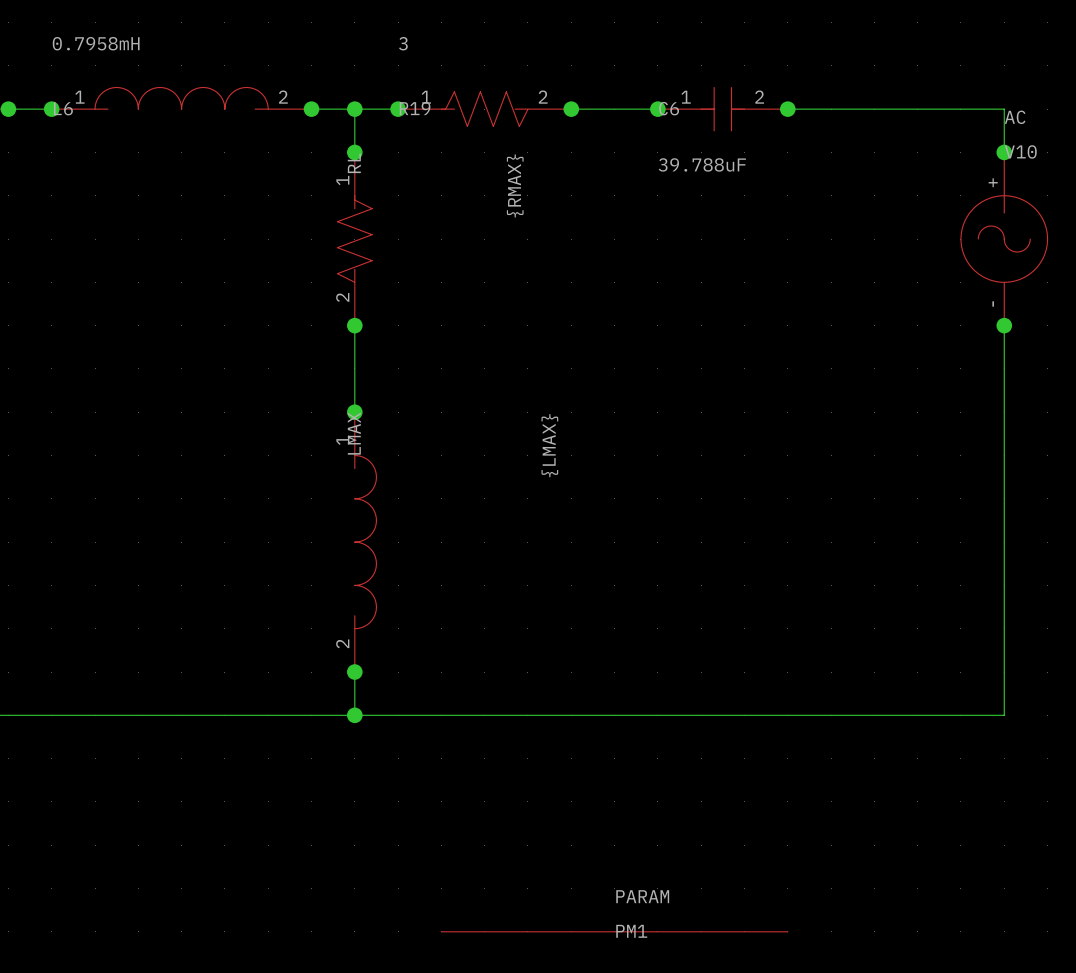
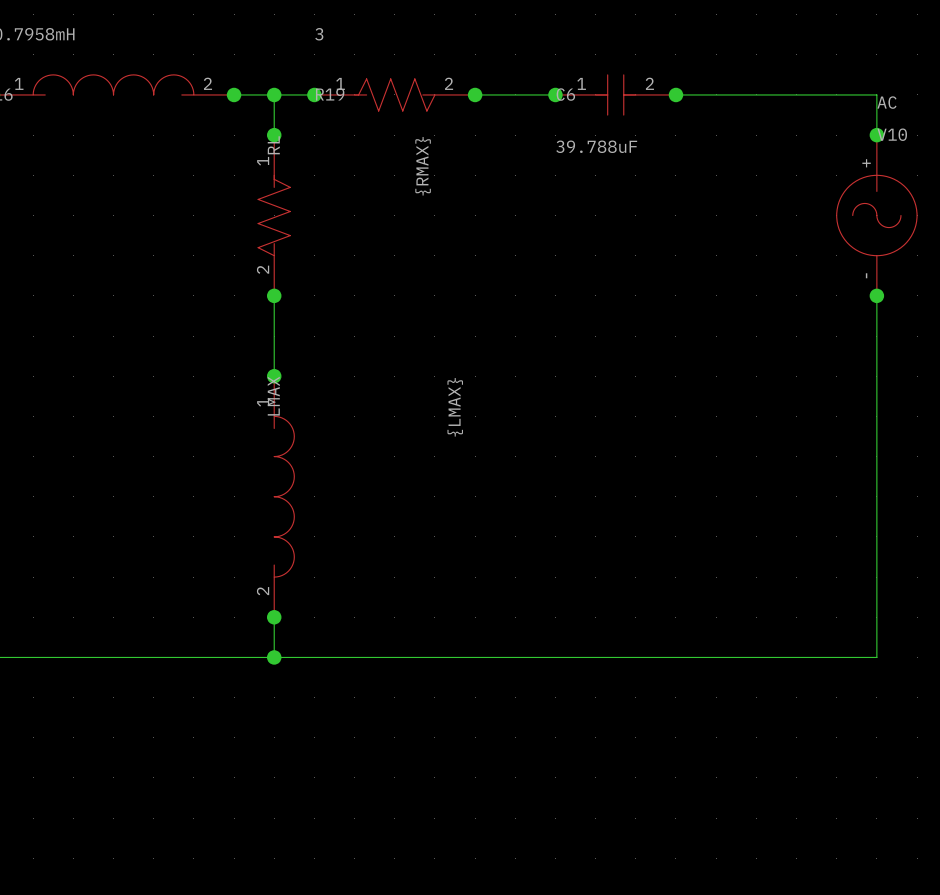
PM1: PARAM (614, 931) -> none

